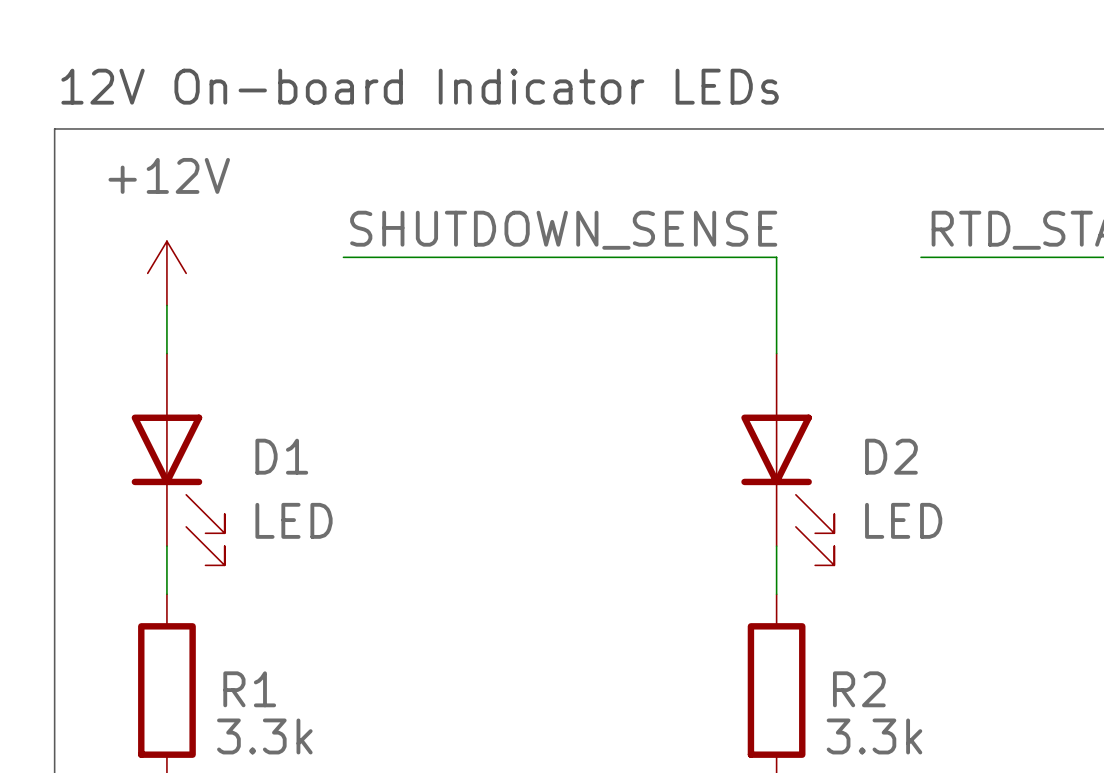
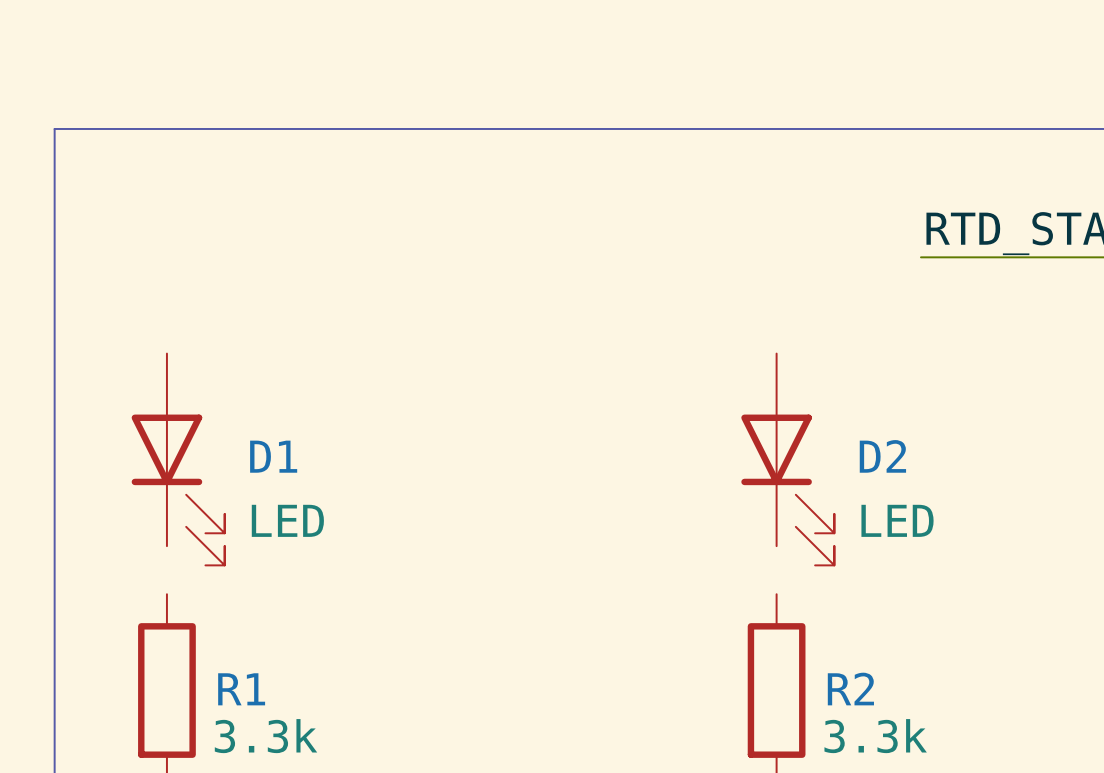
text: 12V On-board Indicator LEDs (420, 86) -> none
label: SHUTDOWN_SENSE (563, 230) -> none
wire: (343, 257) (776, 257) (776, 353) -> none
power symbol: +12V (166, 273) -> none
wire: (166, 305) (166, 353) -> none
wire: (166, 546) (166, 594) -> none
wire: (776, 546) (776, 594) -> none

